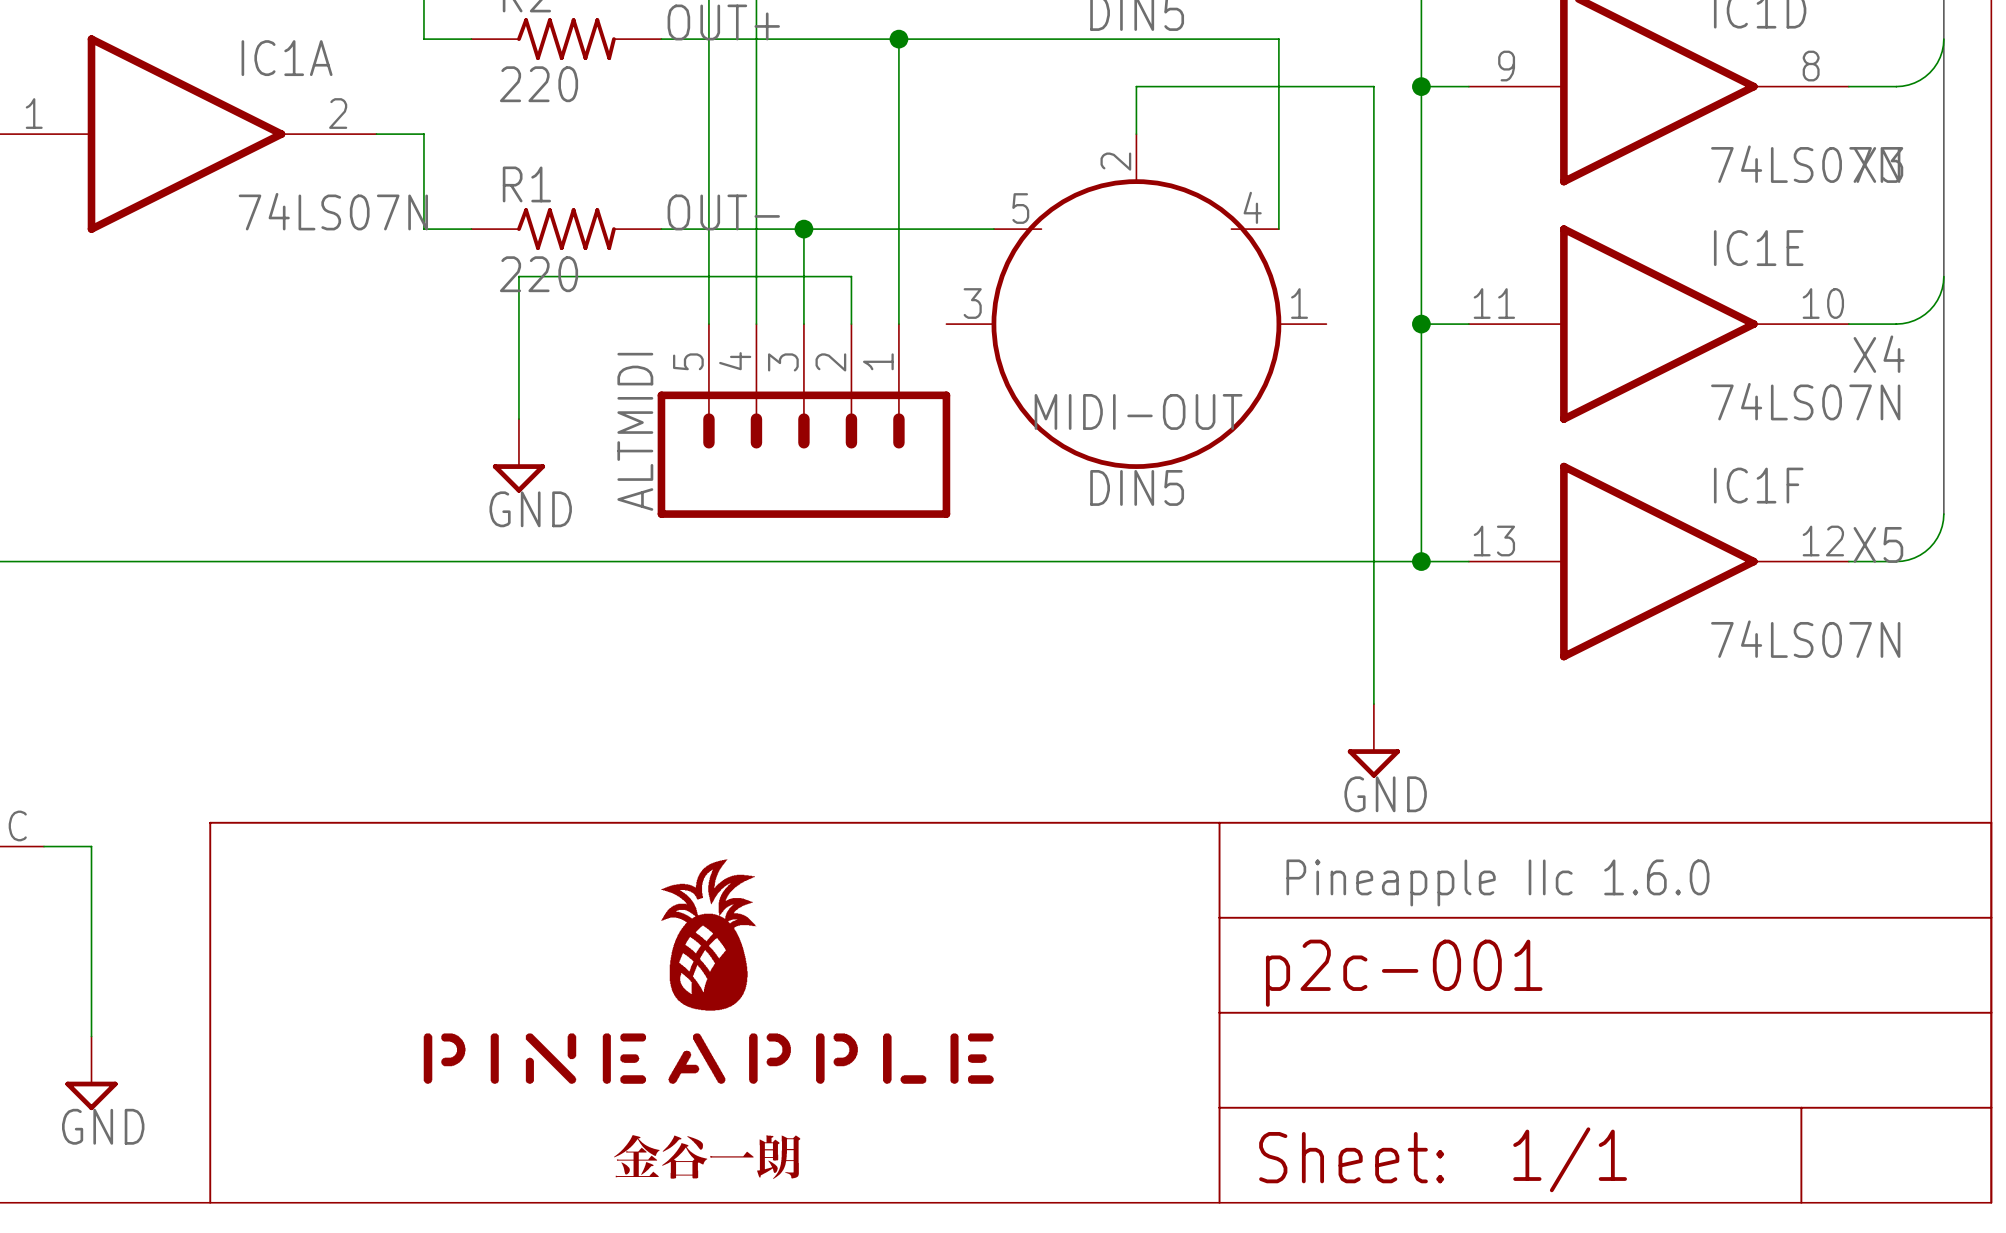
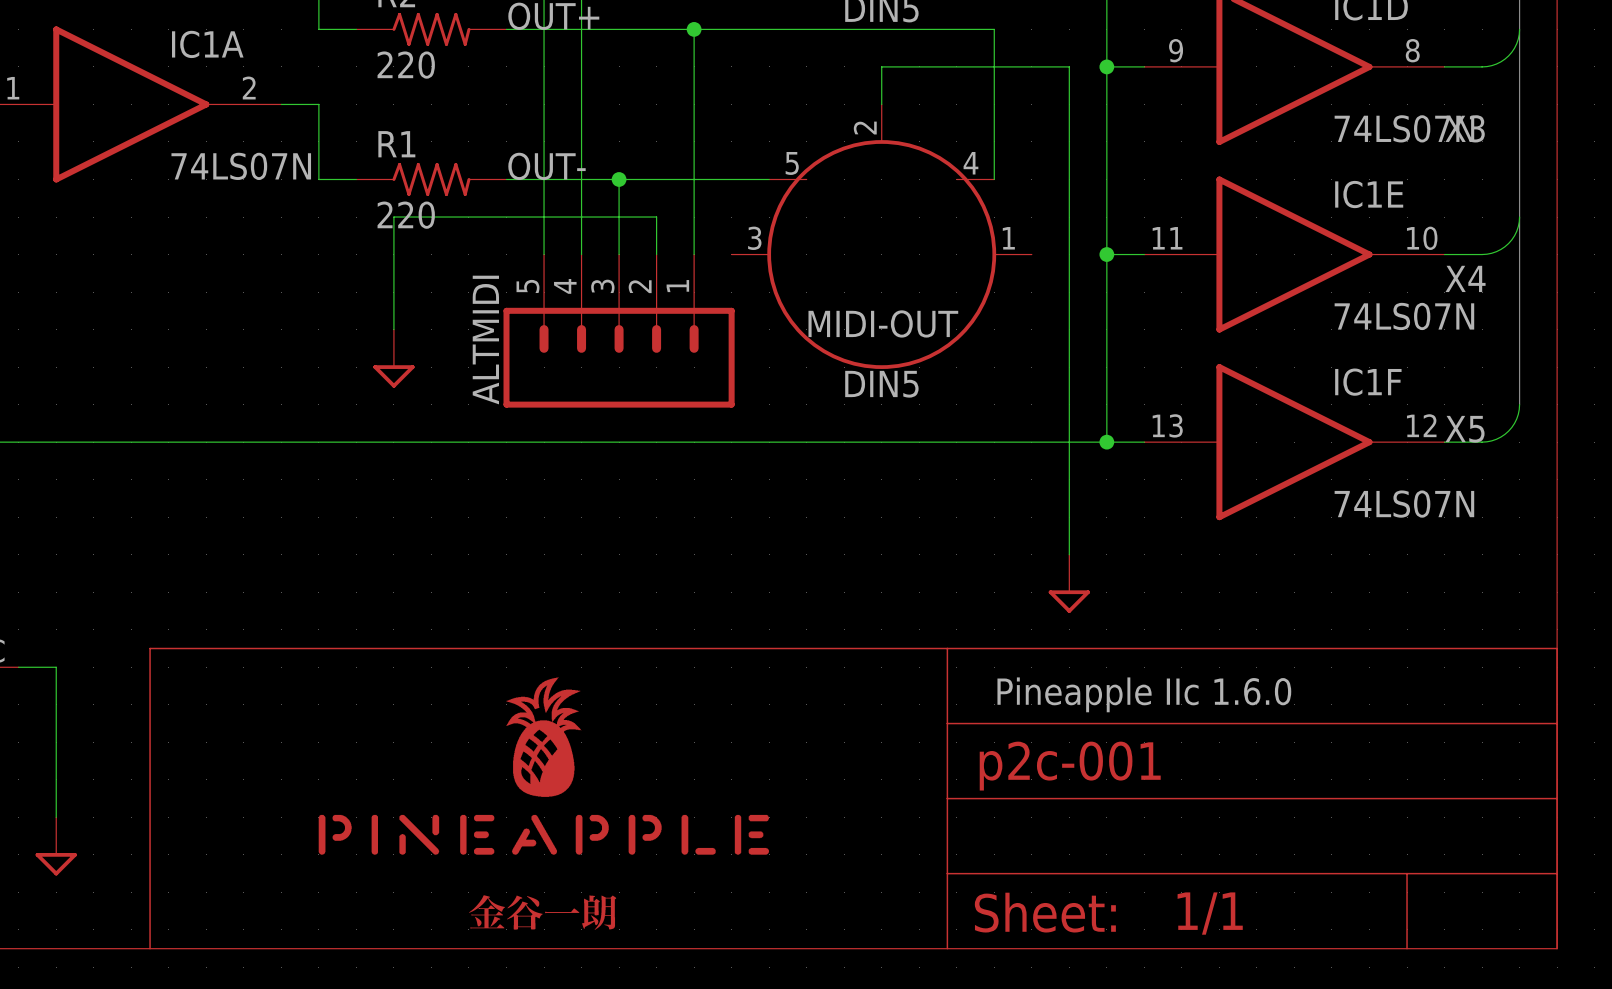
power symbol text: GND (530, 509) -> none
power symbol text: GND (1385, 794) -> none
power symbol text: GND (103, 1126) -> none

